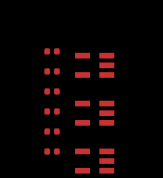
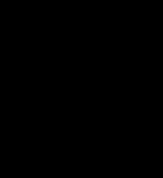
part: (52, 51) -> none
part: (94, 65) -> none
part: (52, 71) -> none
part: (52, 91) -> none
part: (52, 111) -> none
part: (94, 113) -> none
part: (52, 131) -> none
part: (52, 151) -> none
part: (94, 161) -> none

